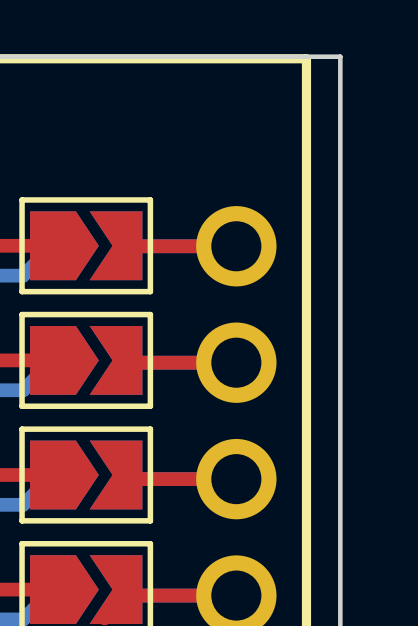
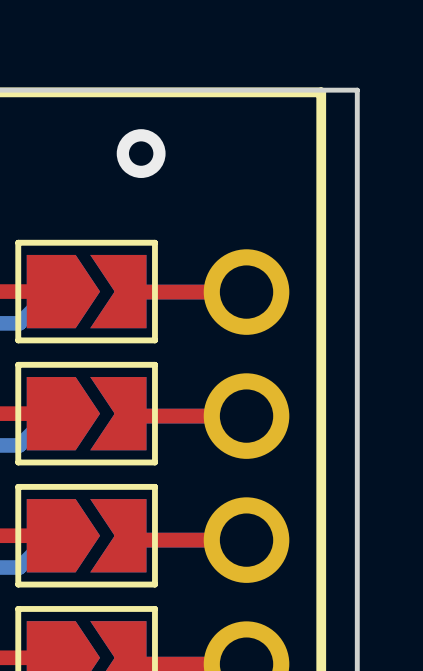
via: none -> (141, 153)

